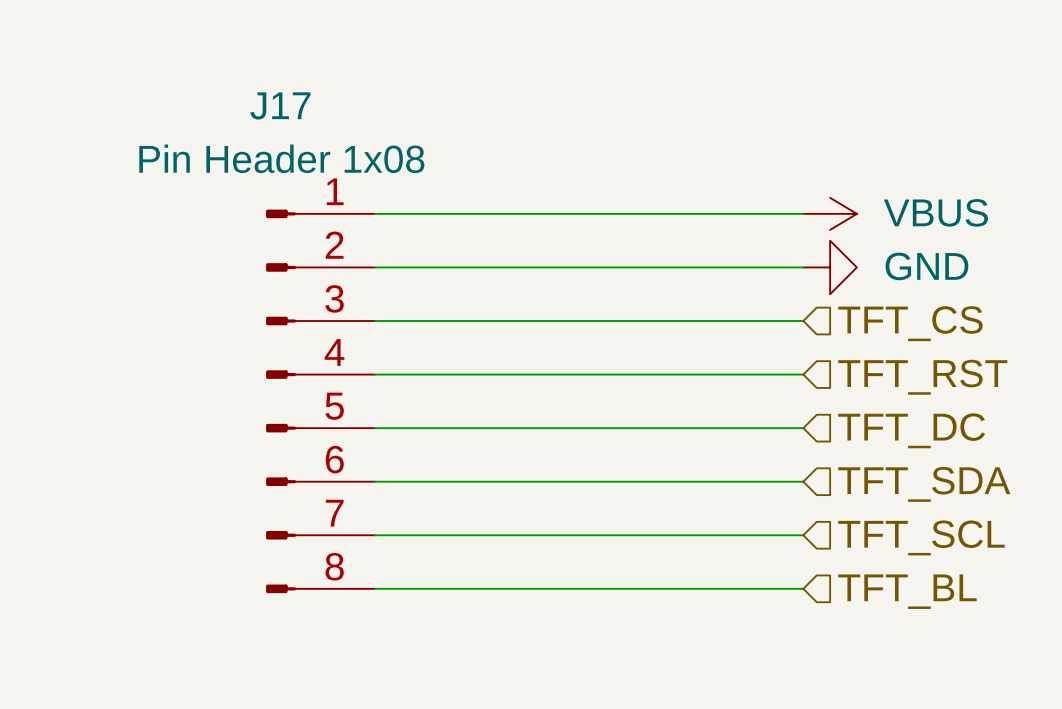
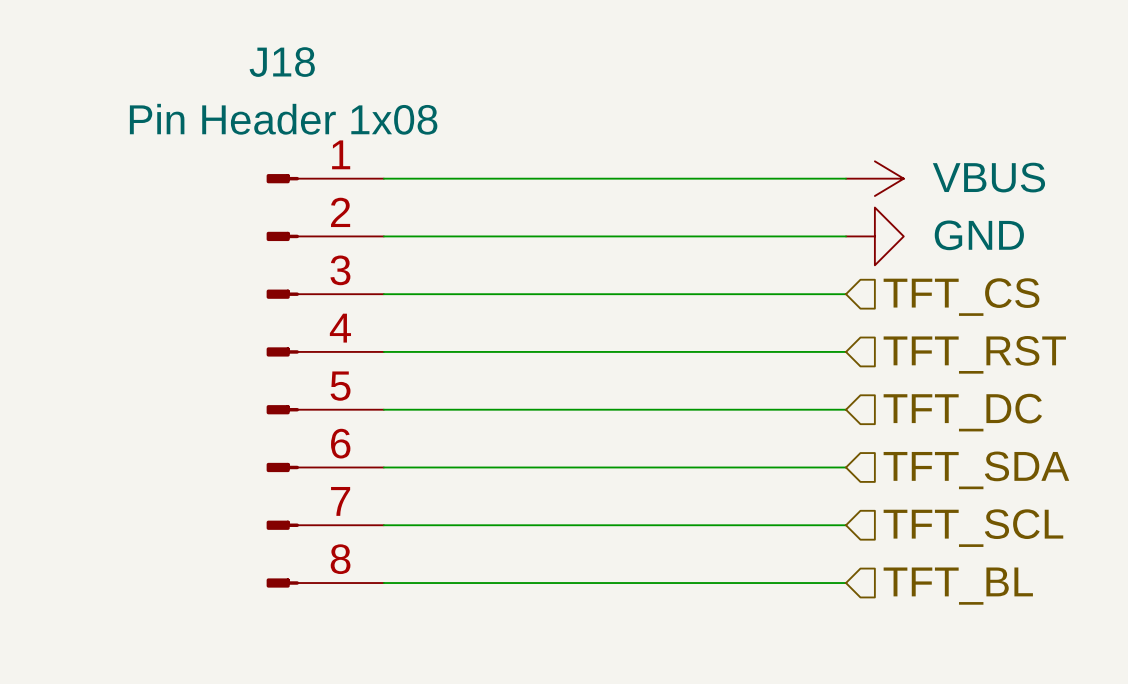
J17 name: J17 (280, 105) -> J18 (282, 62)

